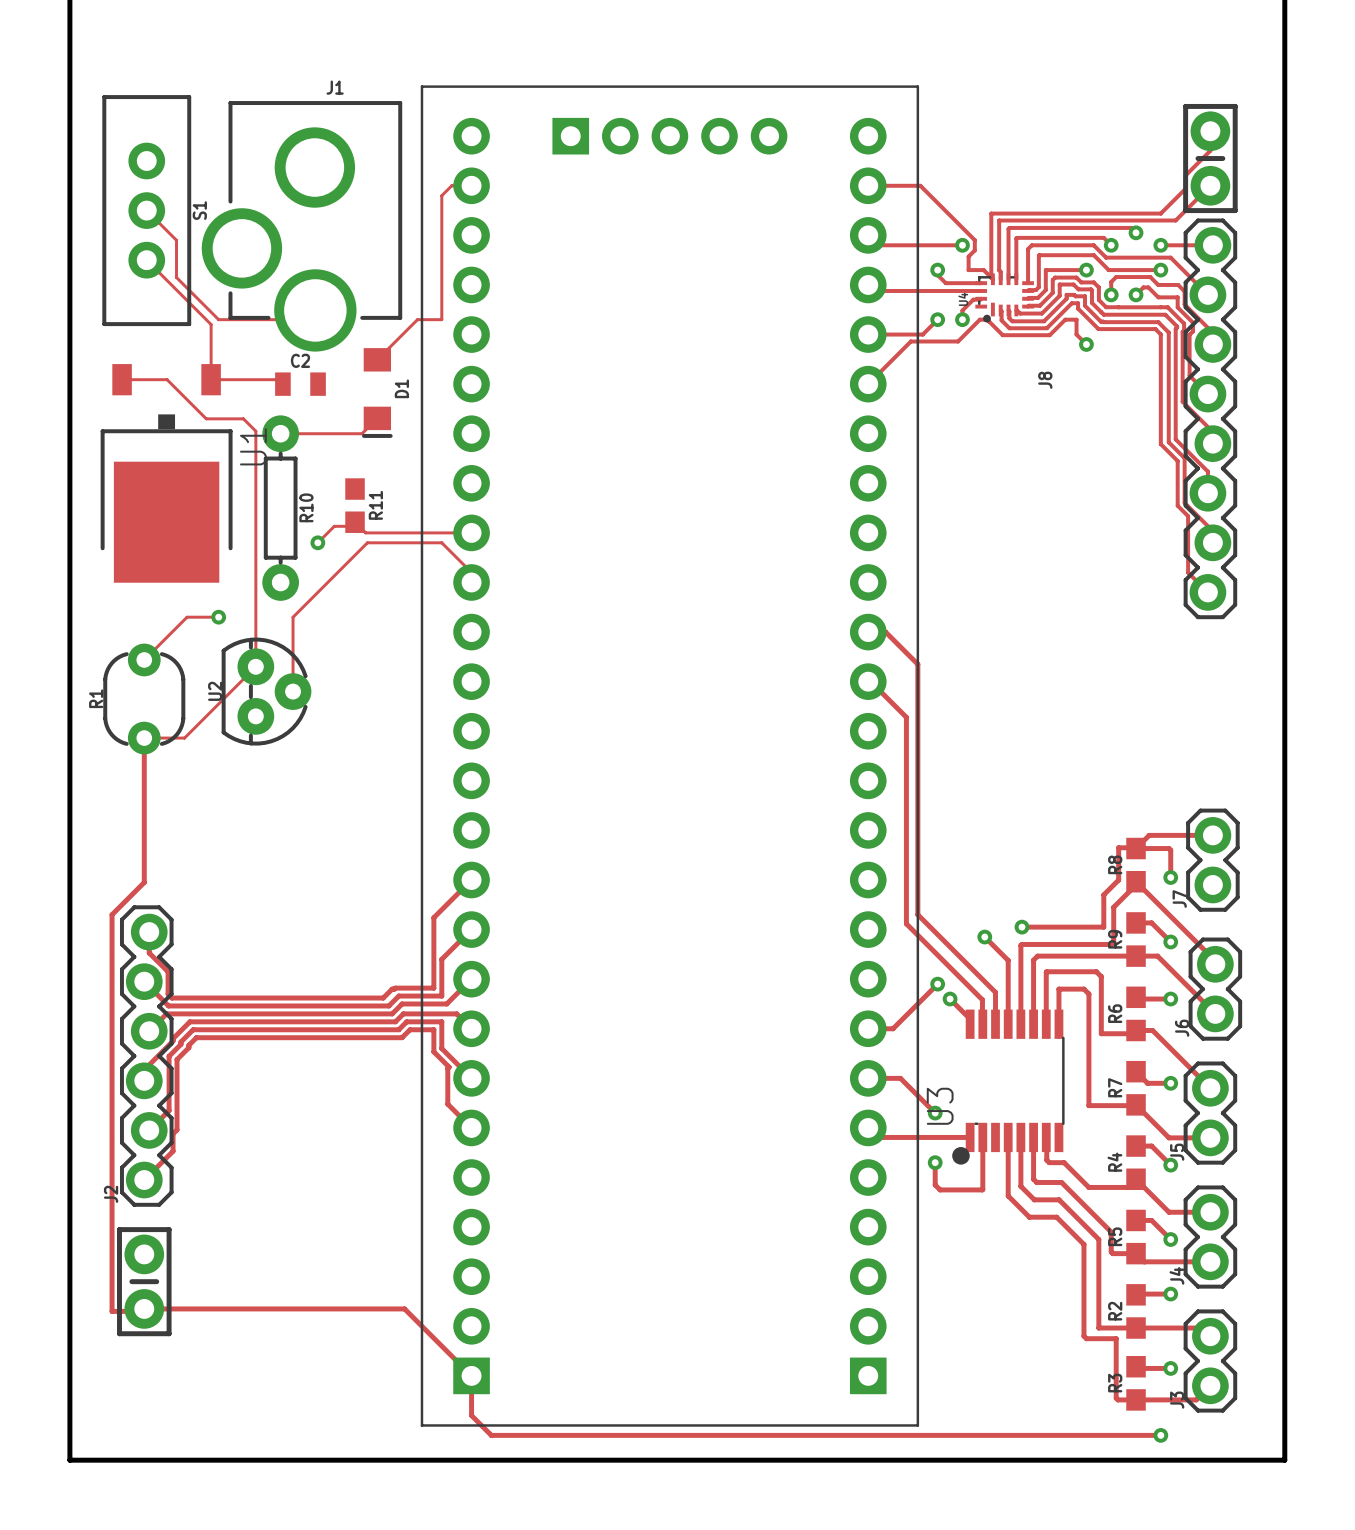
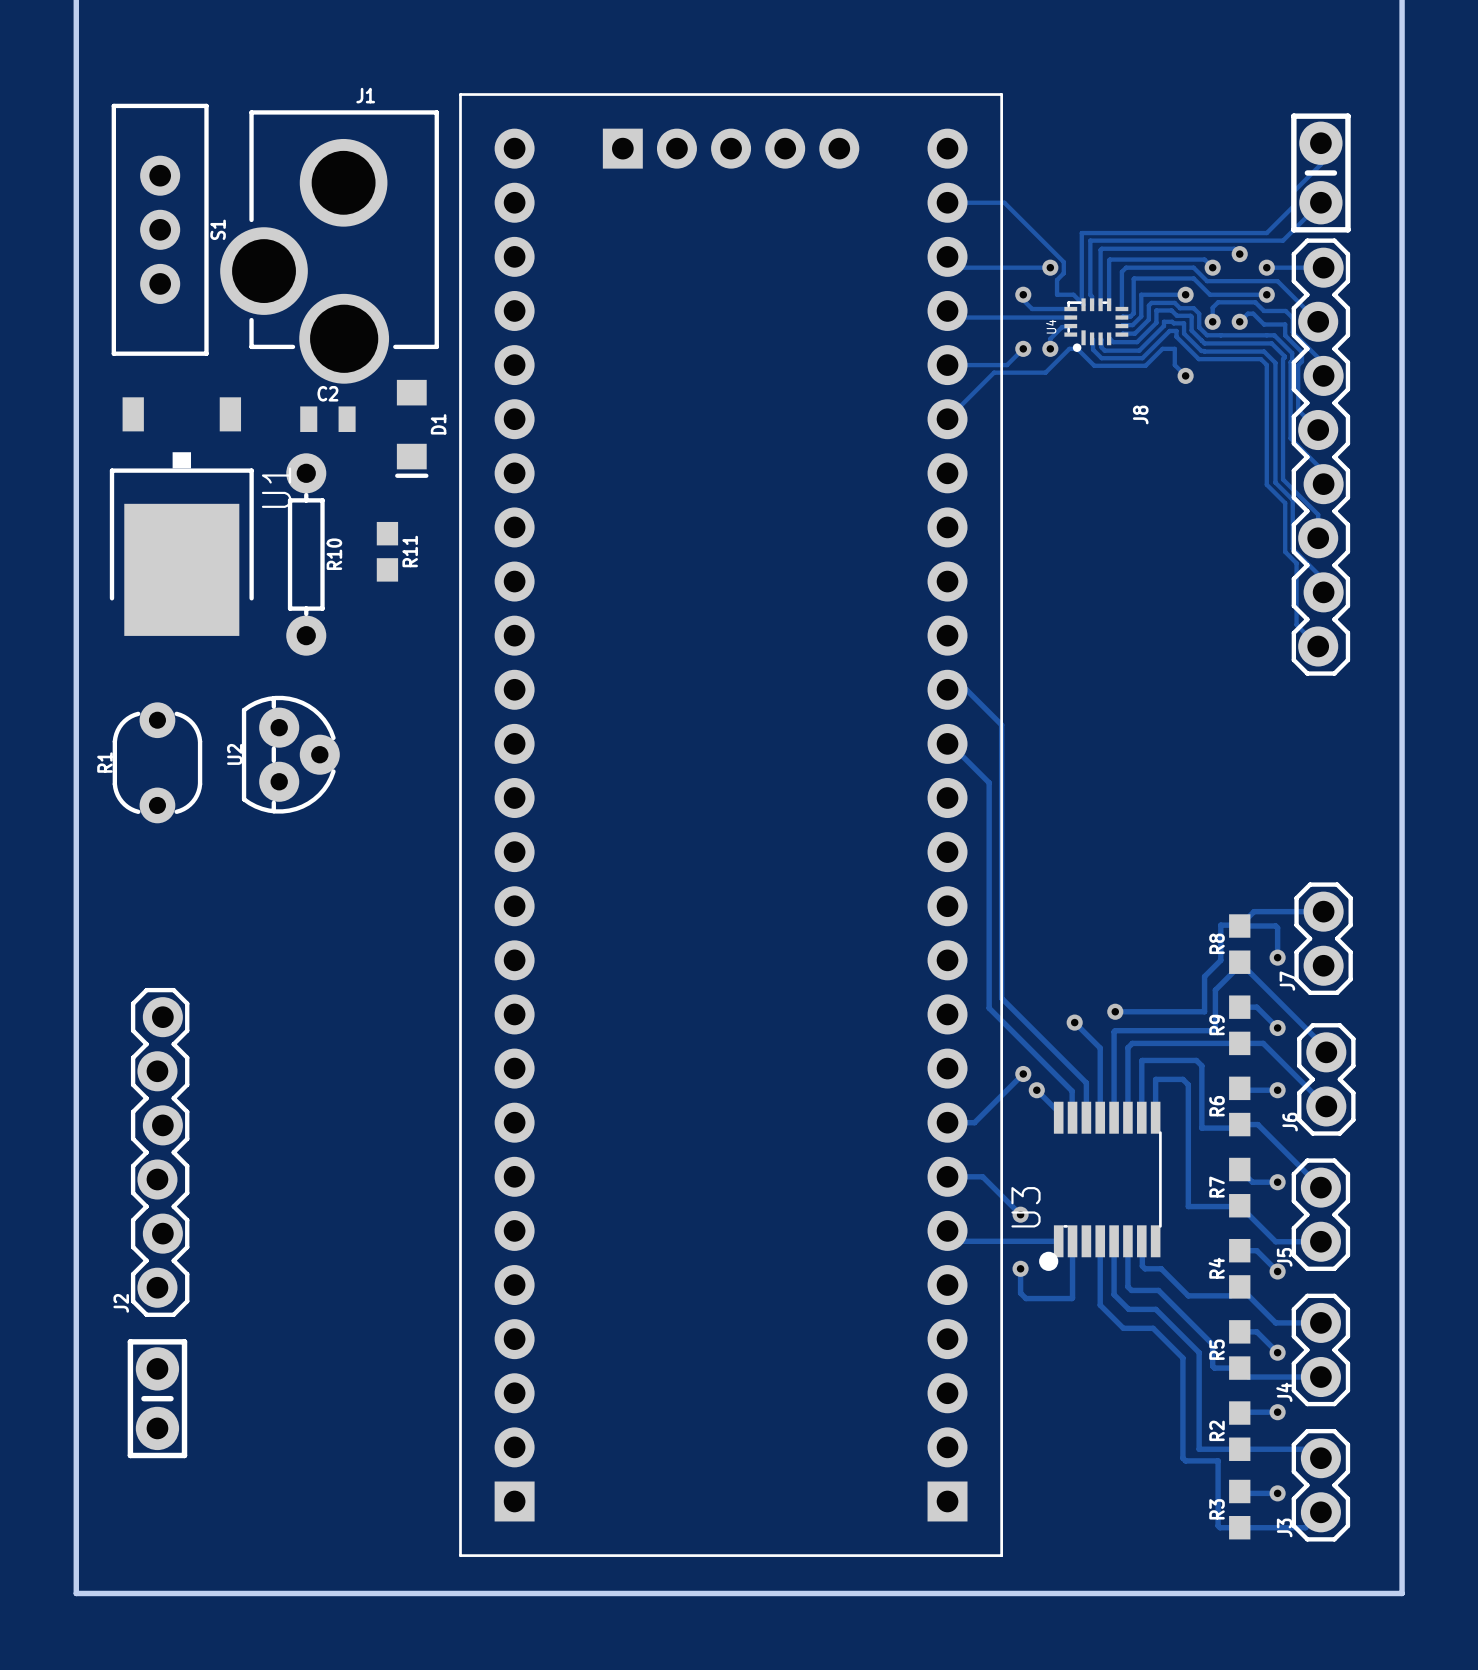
track: (471, 185) (451, 185) (441, 195) (441, 319) (417, 319) (377, 359) -> none
track: (146, 210) (176, 240) (176, 277) (218, 319) (306, 319) (315, 310) -> none
track: (146, 260) (211, 324) (211, 379) (278, 379) (282, 384) -> none
track: (122, 379) (167, 379) (206, 418) (243, 418) (255, 431) (255, 666) (184, 738) (144, 738) (144, 882) (112, 914) (112, 1311) (141, 1311) (144, 1308) (404, 1308) (471, 1375) (471, 1415) (491, 1435) (1160, 1435) -> none
track: (377, 418) (362, 433) (280, 433) -> none
track: (355, 522) (365, 532) (471, 532) -> none
track: (359, 526) (334, 526) (317, 542) -> none
via: (317, 542) -> none
track: (471, 582) (471, 572) (441, 542) (367, 542) (293, 617) (293, 691) -> none
track: (218, 617) (187, 617) (144, 659) -> none
via: (218, 617) -> none
track: (471, 880) (433, 917) (433, 988) (395, 988) (383, 998) (171, 998) (168, 994) (168, 971) (149, 952) (149, 932) -> none
track: (471, 929) (441, 959) (441, 996) (398, 996) (388, 1005) (168, 1005) (144, 981) -> none
track: (471, 979) (446, 1003) (402, 1003) (392, 1013) (166, 1013) (149, 1031) -> none
track: (471, 1028) (456, 1013) (403, 1013) (395, 1021) (189, 1021) (144, 1069) (144, 1080) -> none
track: (471, 1078) (441, 1048) (441, 1021) (406, 1021) (398, 1029) (193, 1029) (169, 1056) (169, 1110) (149, 1130) -> none
track: (471, 1127) (447, 1104) (449, 1067) (433, 1051) (433, 1029) (410, 1029) (402, 1037) (196, 1037) (177, 1059) (177, 1129) (173, 1133) (173, 1151) (144, 1180) -> none
via: (1160, 1435) -> none

